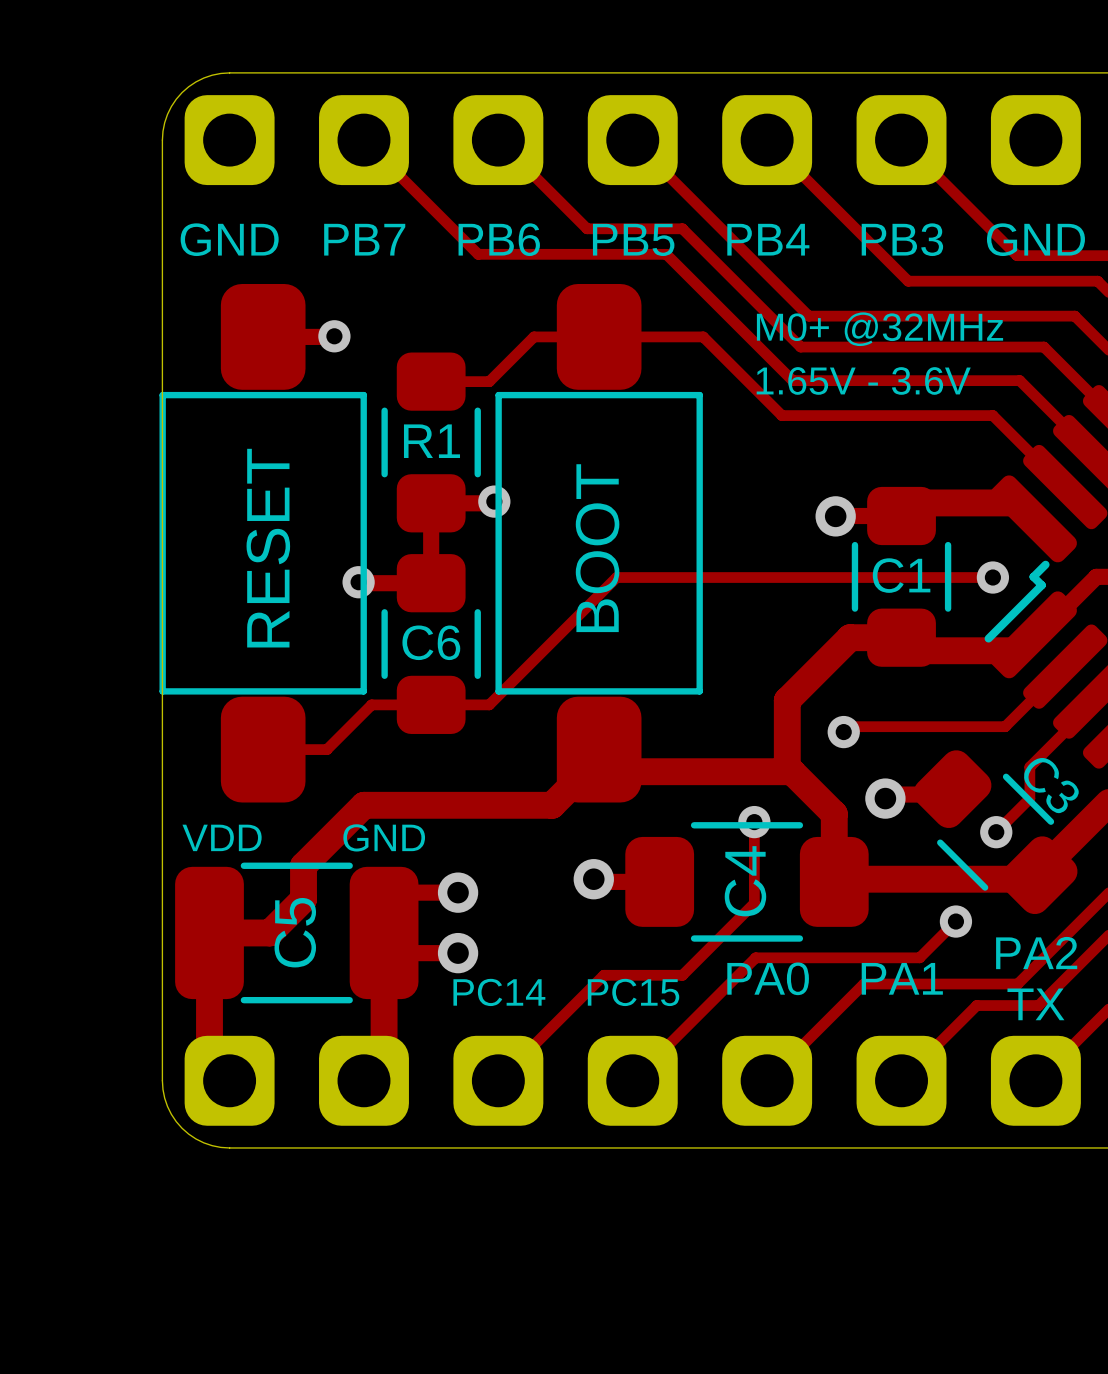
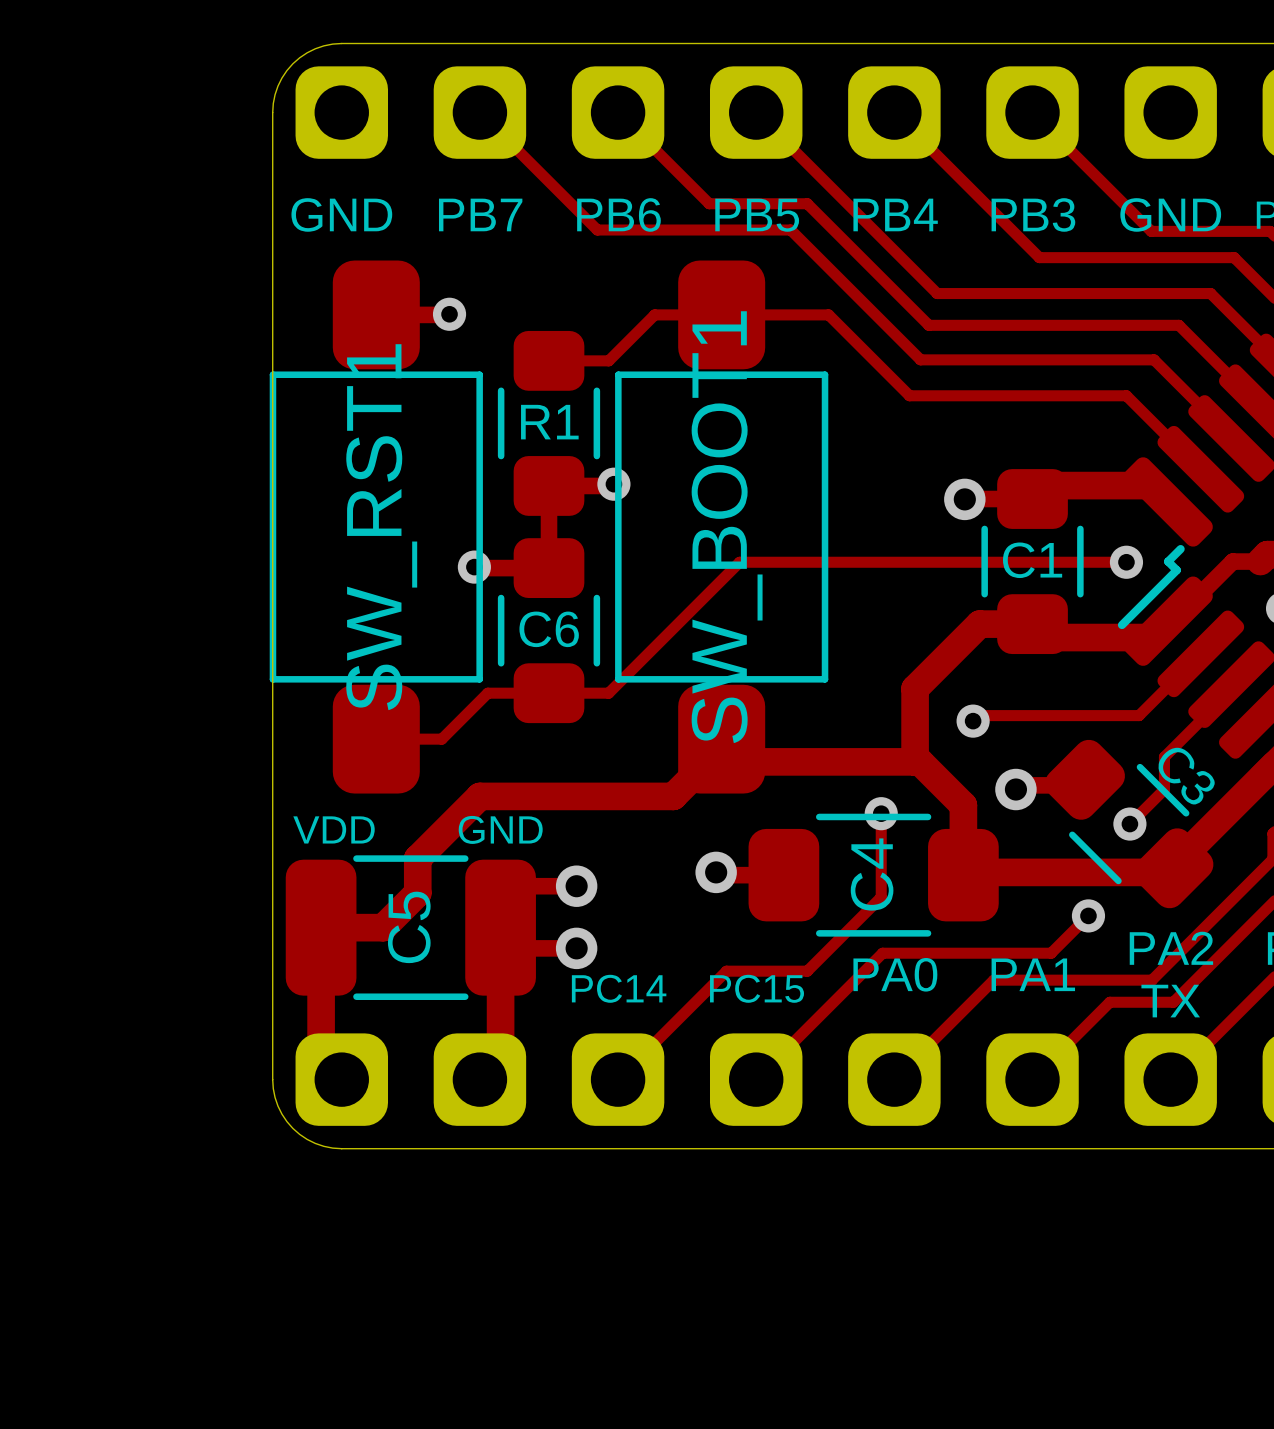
text: M0+ @32MHz (880, 329) -> none
text: 1.65V - 3.6V (863, 380) -> none
SW_RST1 name: none -> SW_RST1 (381, 527)
SW_BOOT1 name: none -> SW_BOOT1 (727, 527)
text: RESET (268, 548) -> none
text: BOOT (597, 548) -> none

